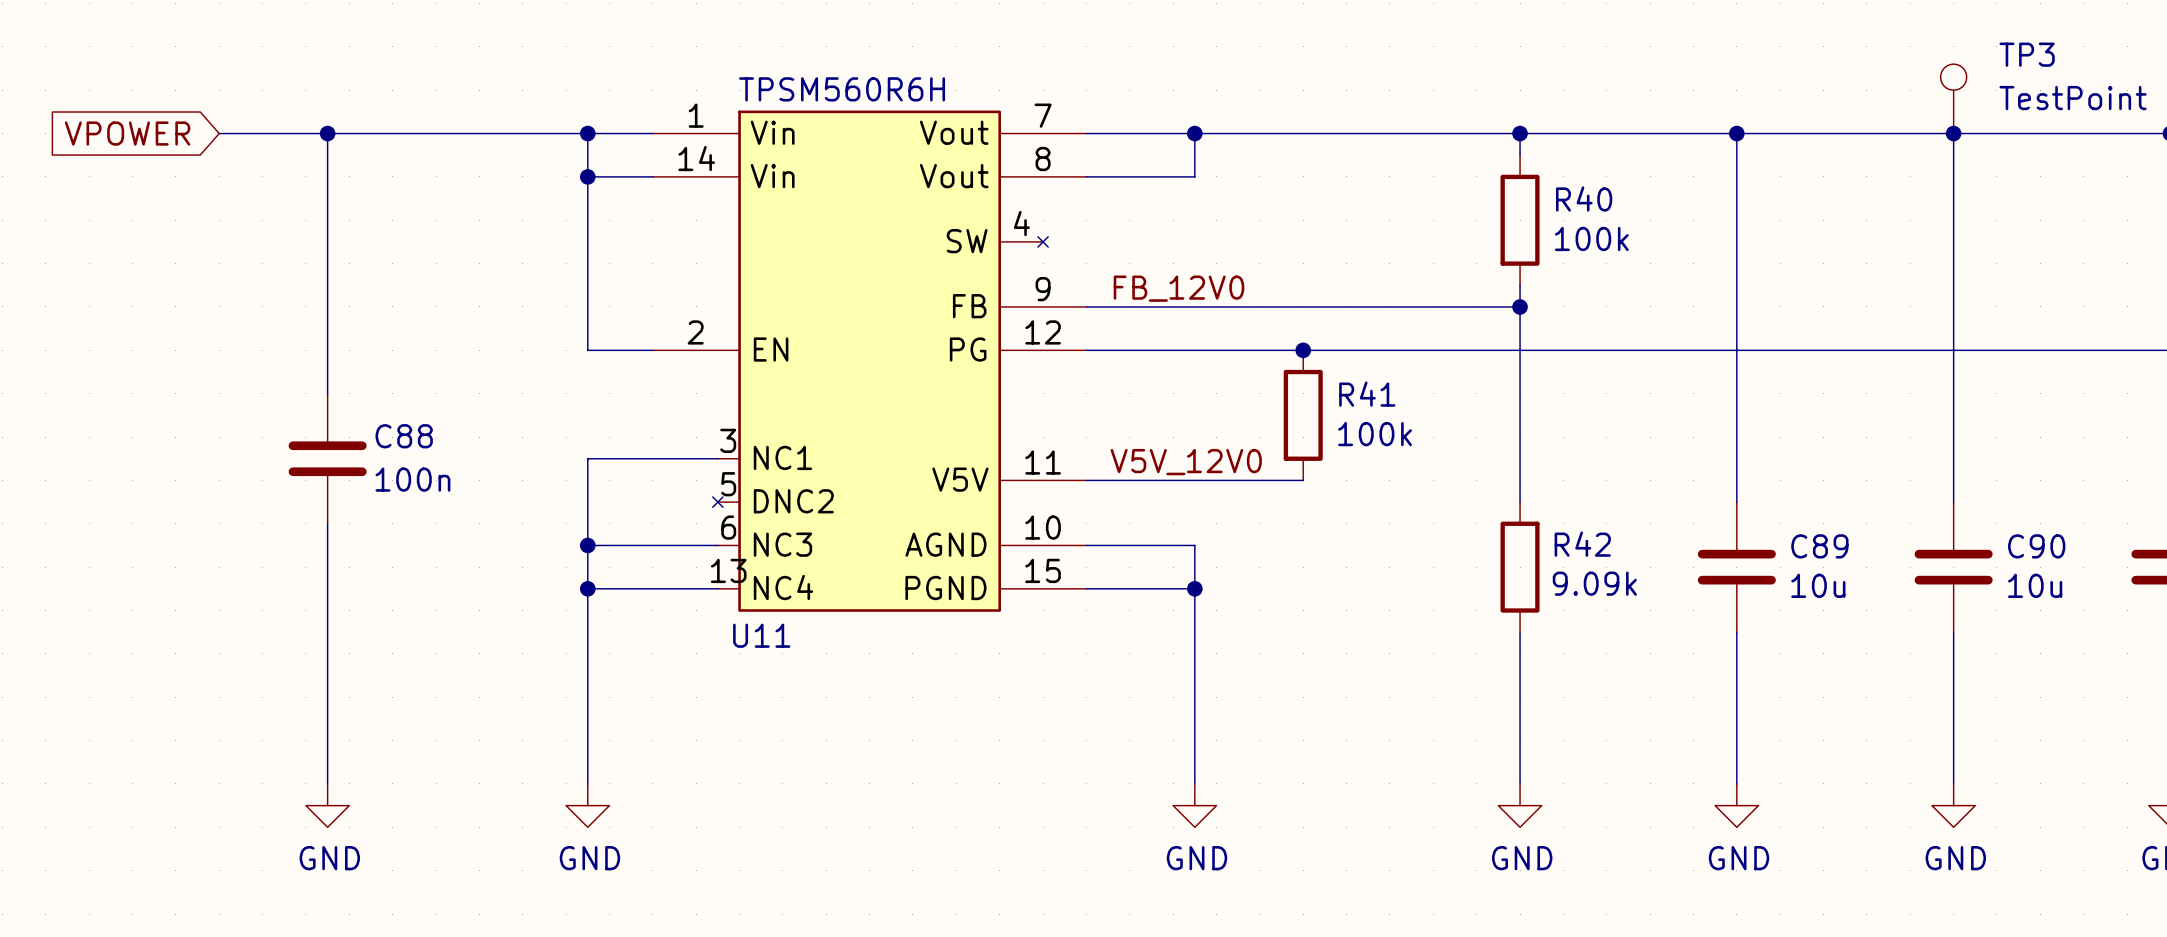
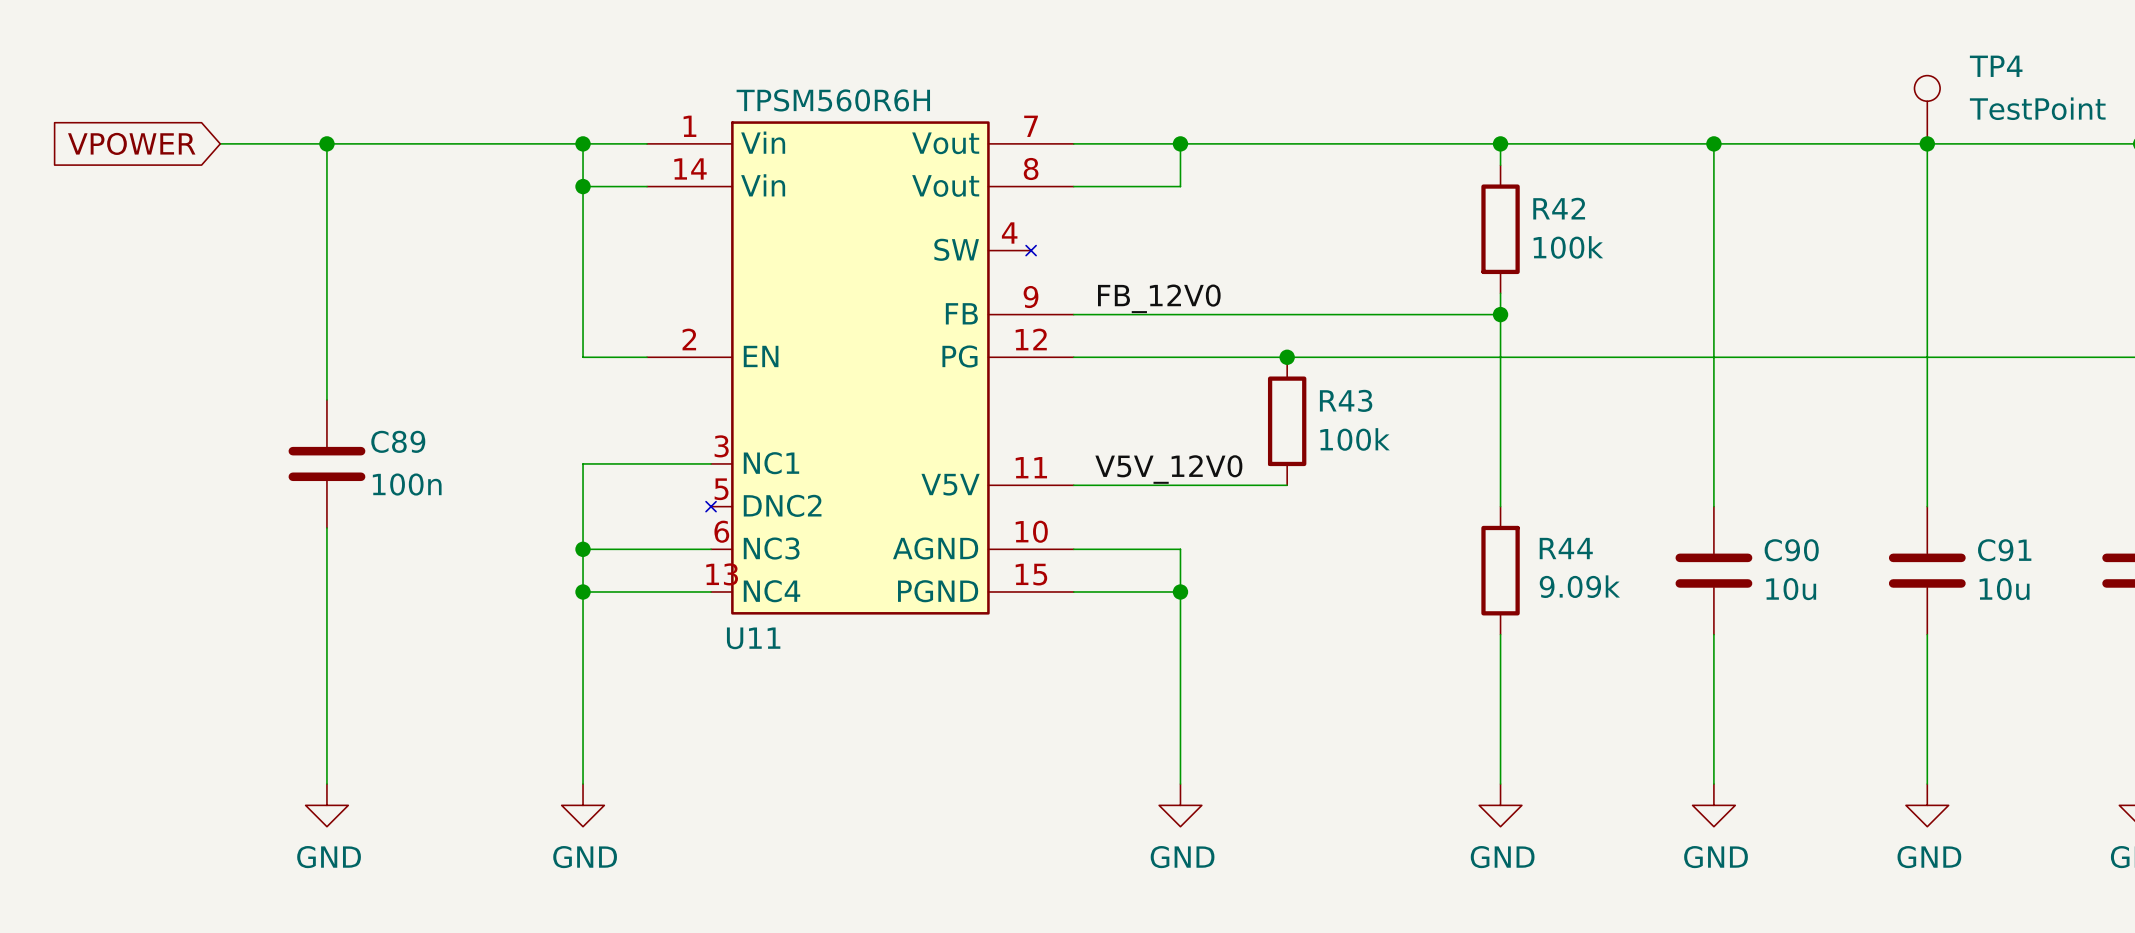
TP3 name: TP3 (2027, 54) -> TP4 (1996, 66)
R40 name: R40 (1584, 198) -> R42 (1559, 208)
R41 name: R41 (1367, 394) -> R43 (1346, 400)
C88 name: C88 (404, 436) -> C89 (398, 441)
R42 name: R42 (1582, 544) -> R44 (1566, 548)
C89 name: C89 (1819, 546) -> C90 (1791, 550)
C90 name: C90 (2036, 546) -> C91 (2004, 550)

